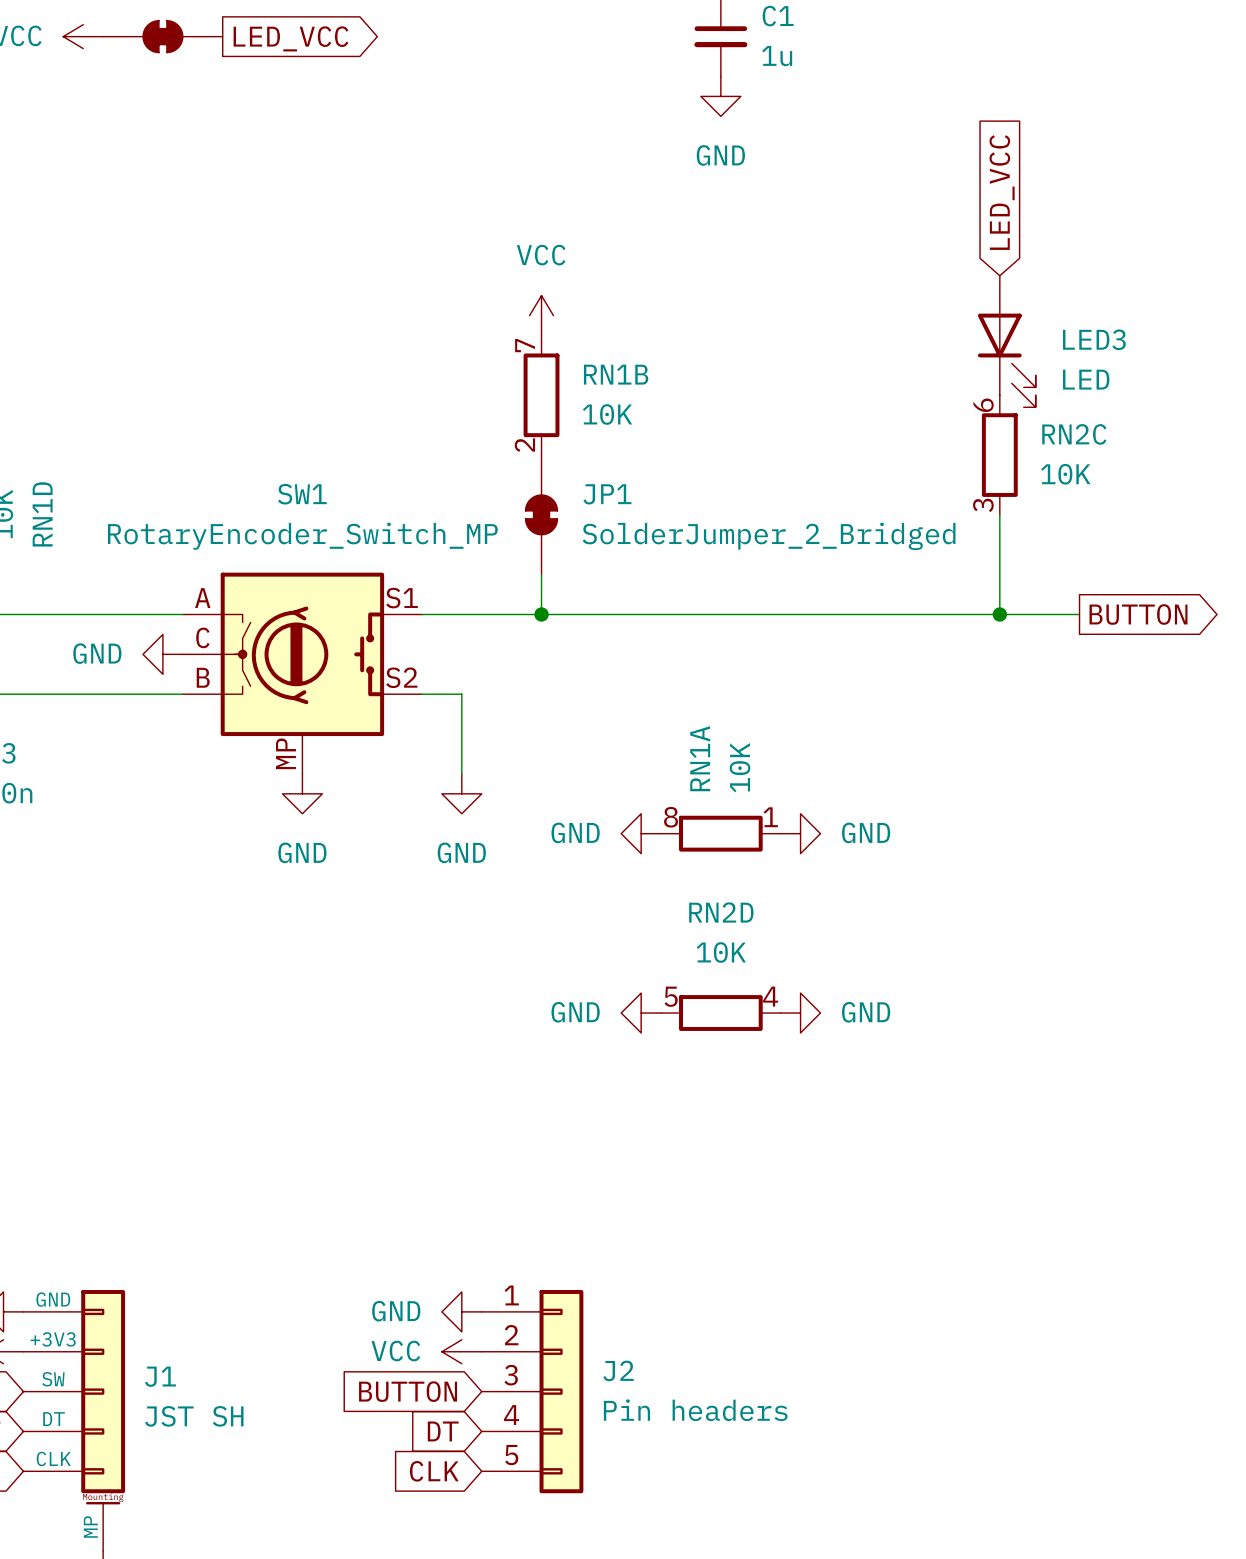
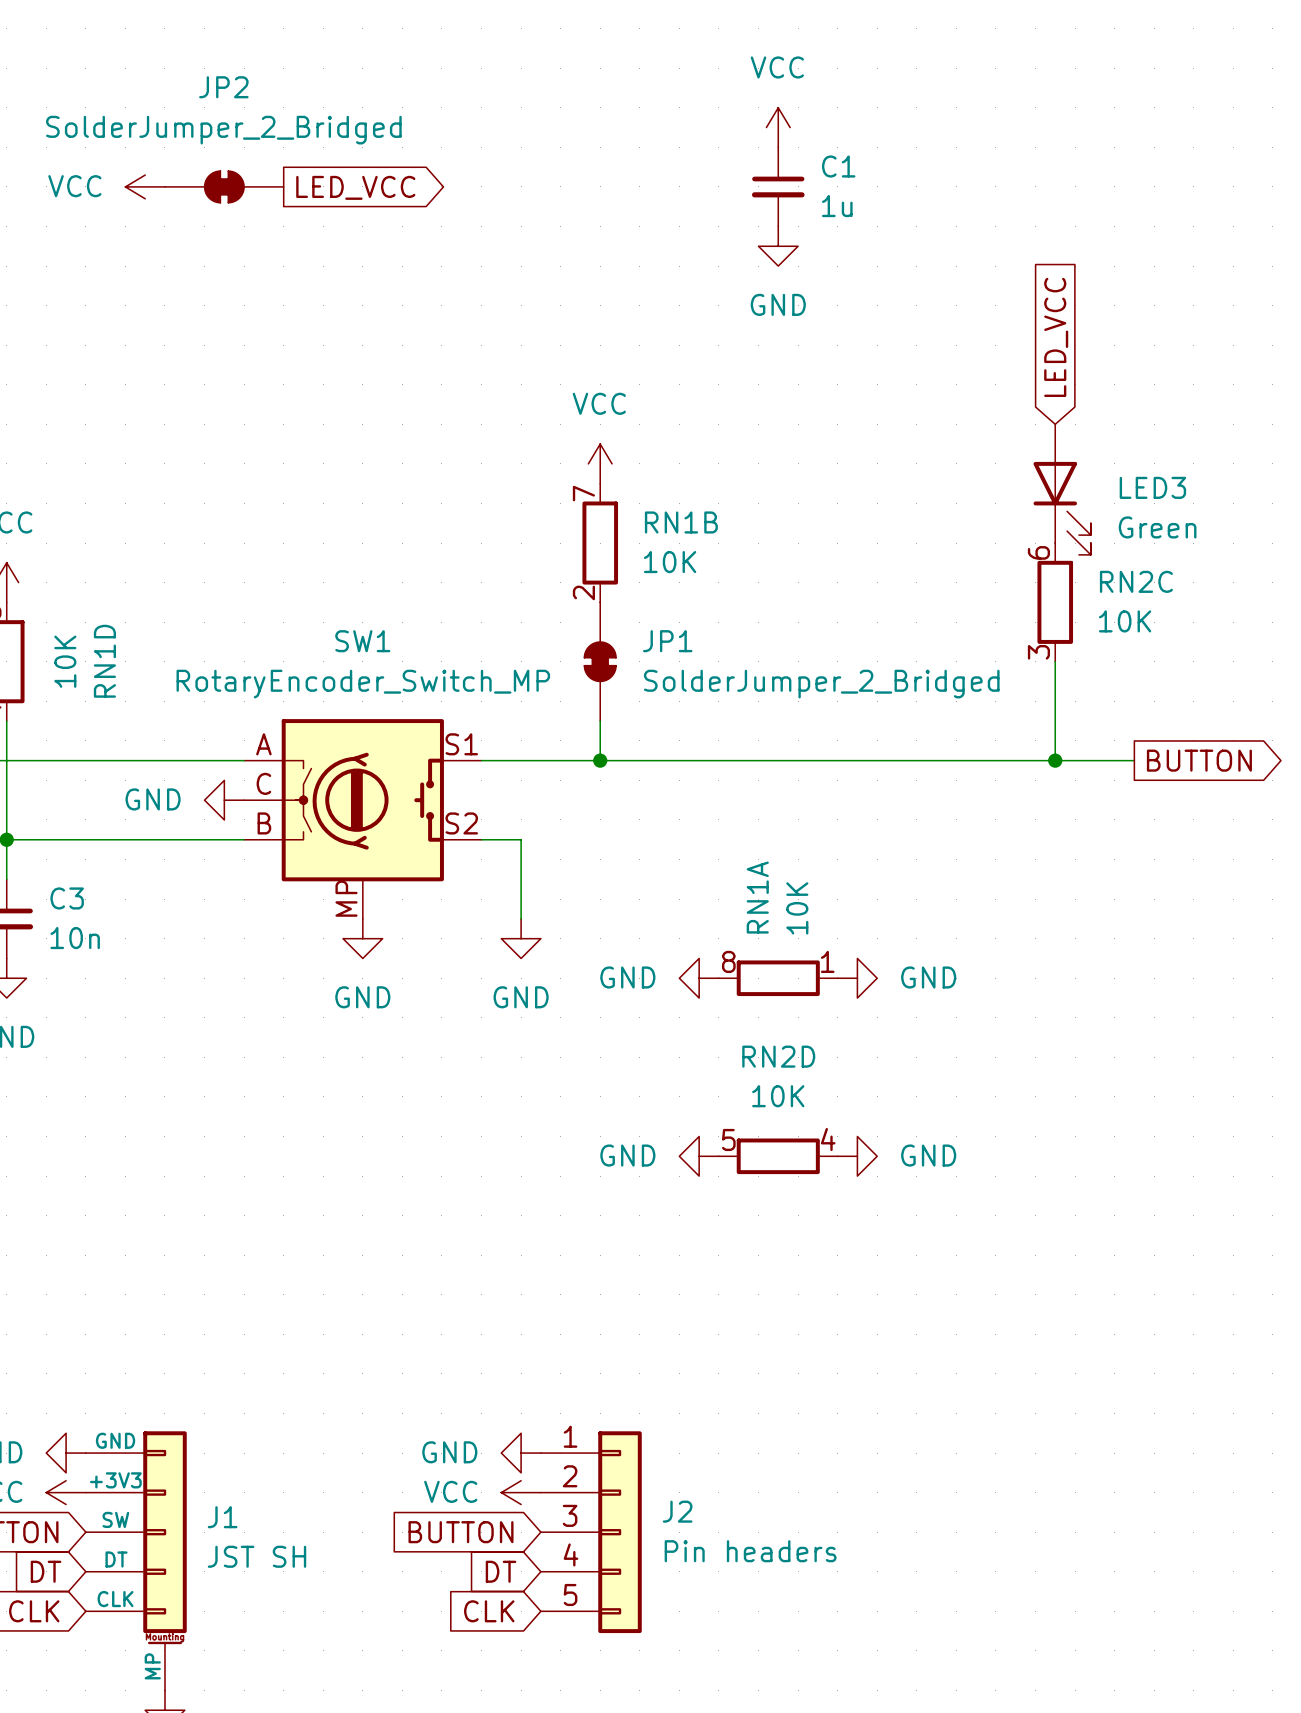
LED3 value: LED (1086, 379) -> Green (1157, 527)

